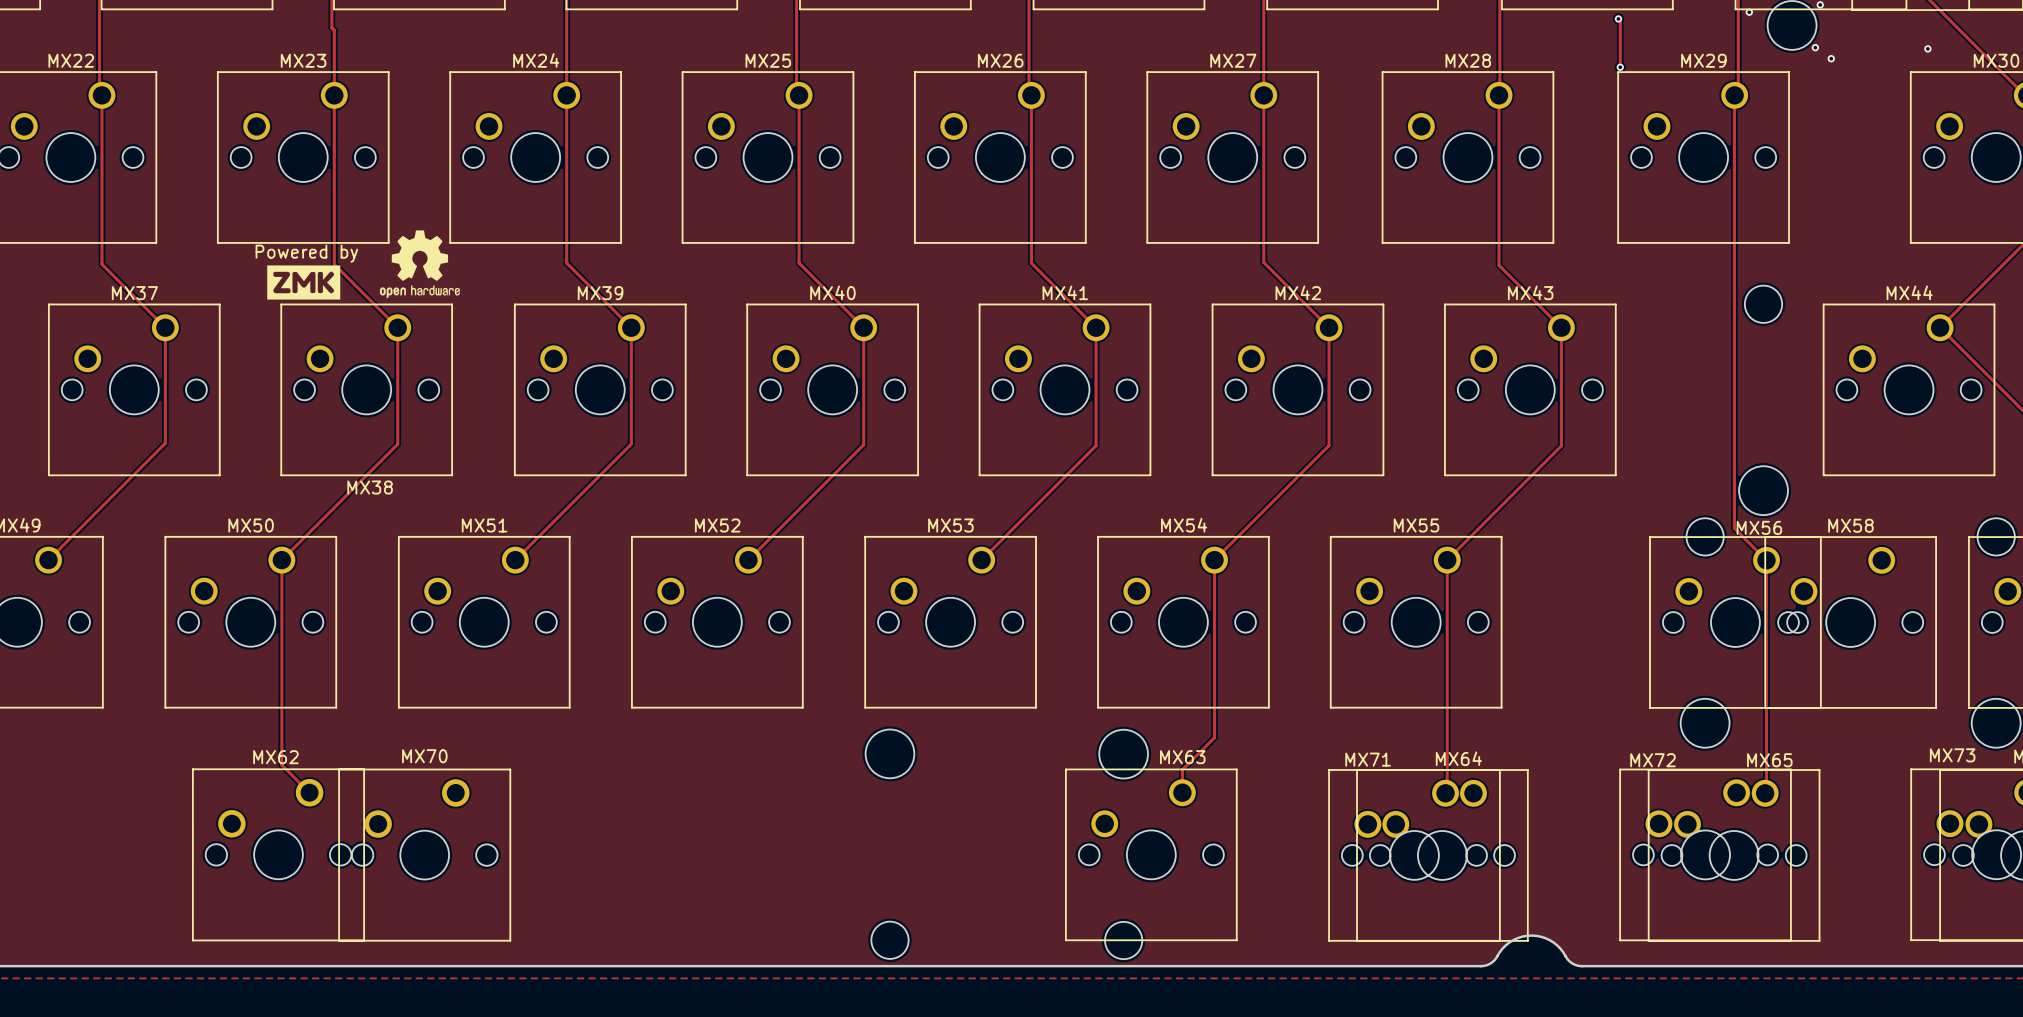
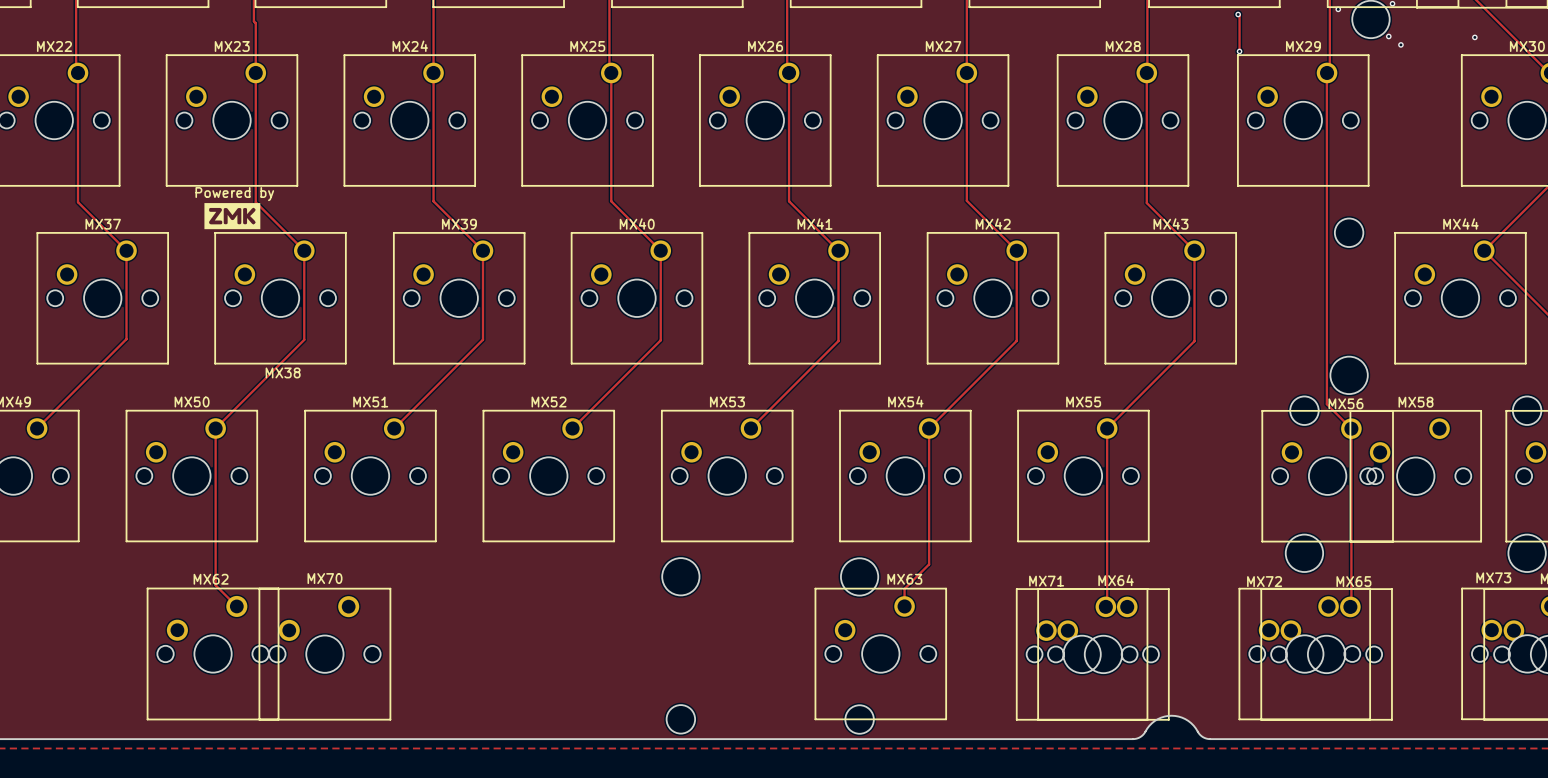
drawing: [379, 230, 460, 299] -> none

